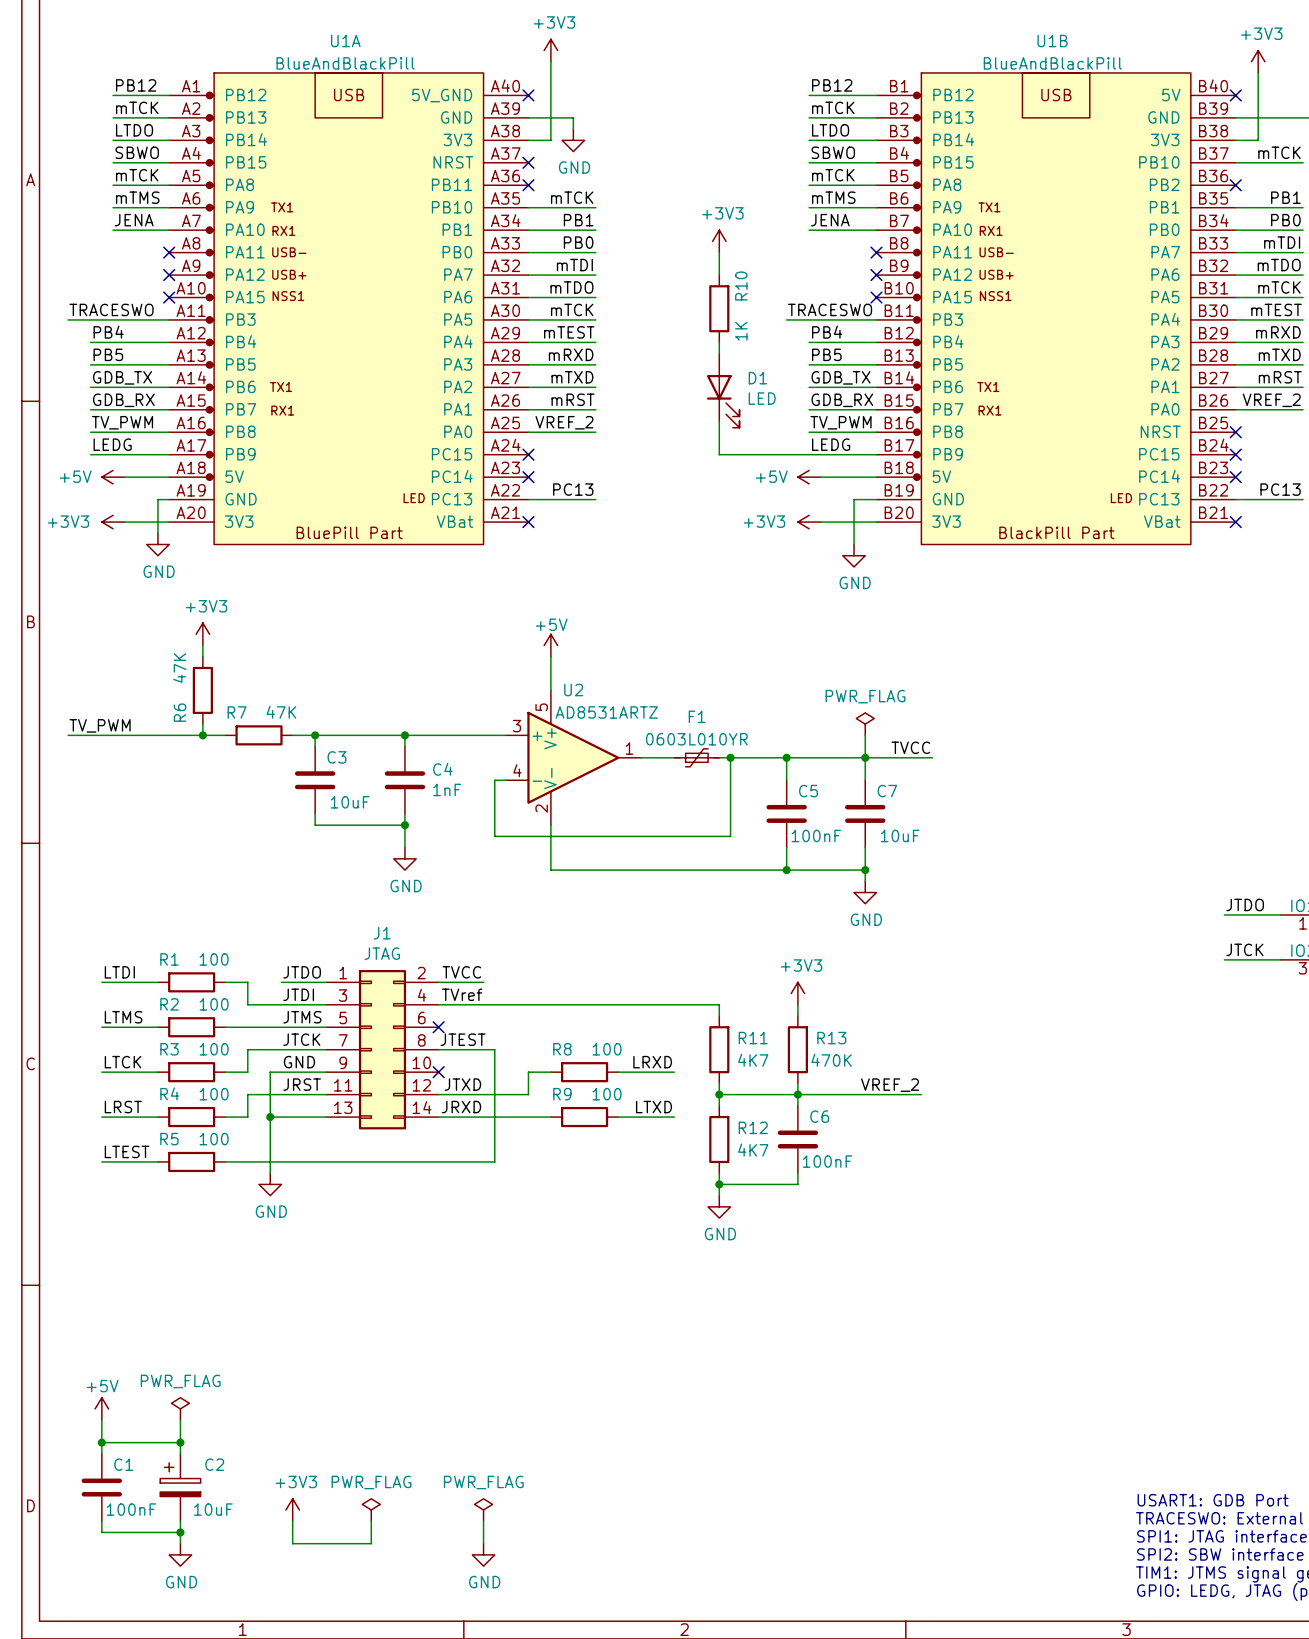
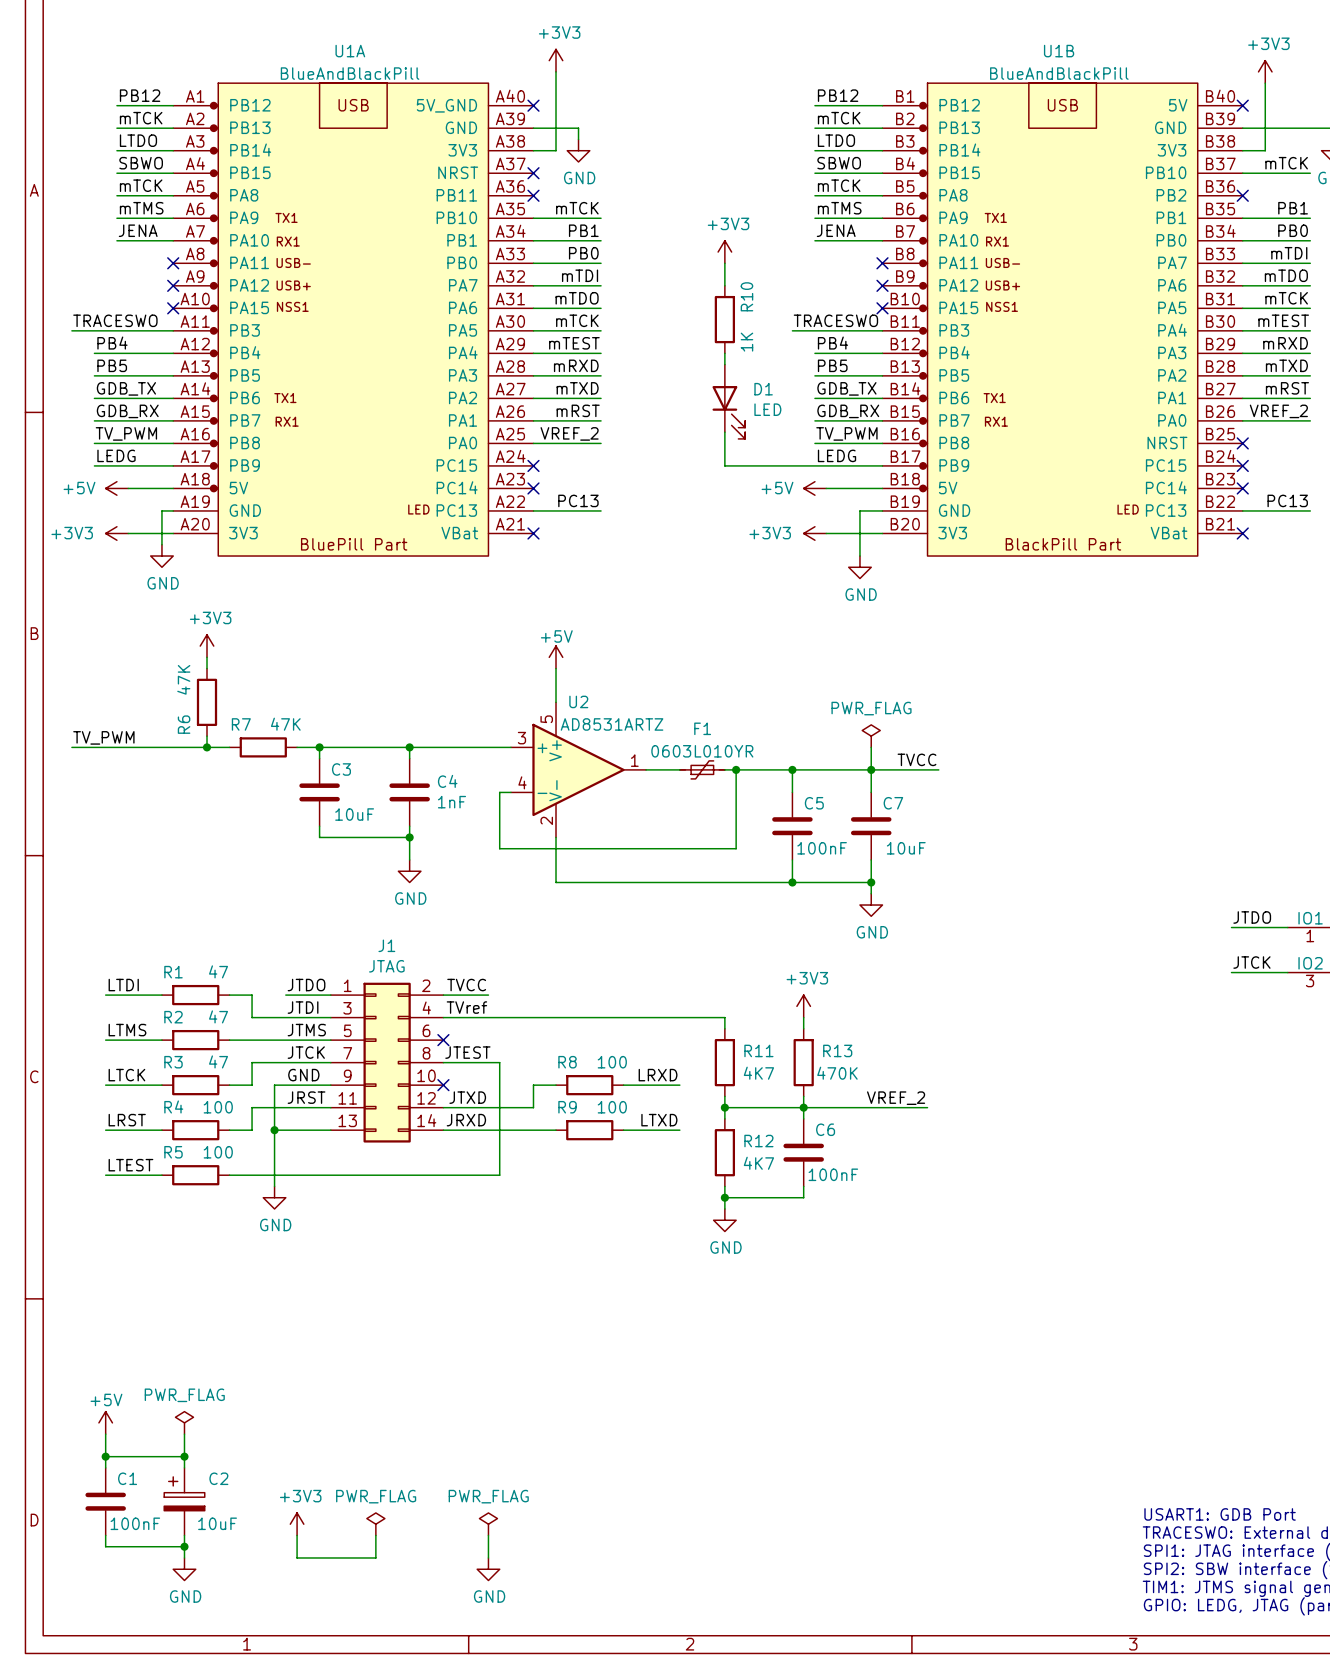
R1 value: 100 (214, 959) -> 47 (218, 971)
R2 value: 100 (214, 1004) -> 47 (218, 1016)
R3 value: 100 (214, 1049) -> 47 (218, 1061)

